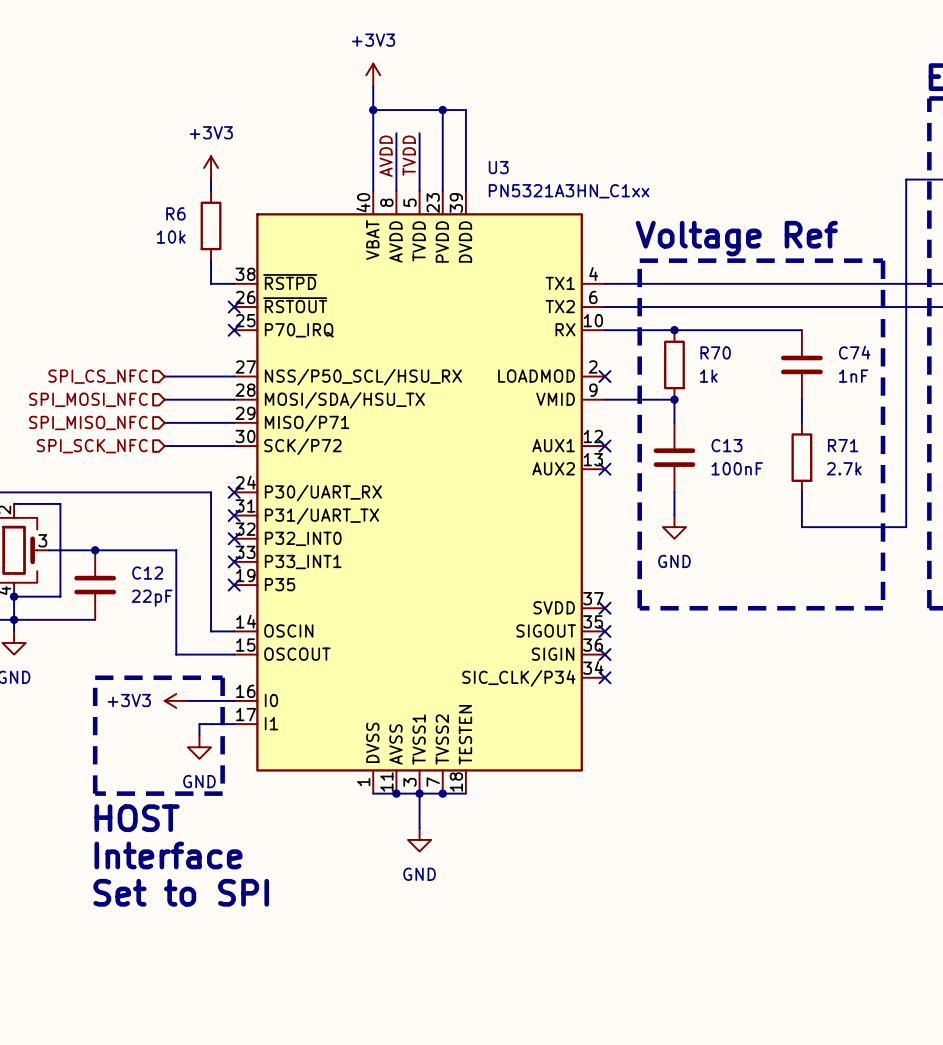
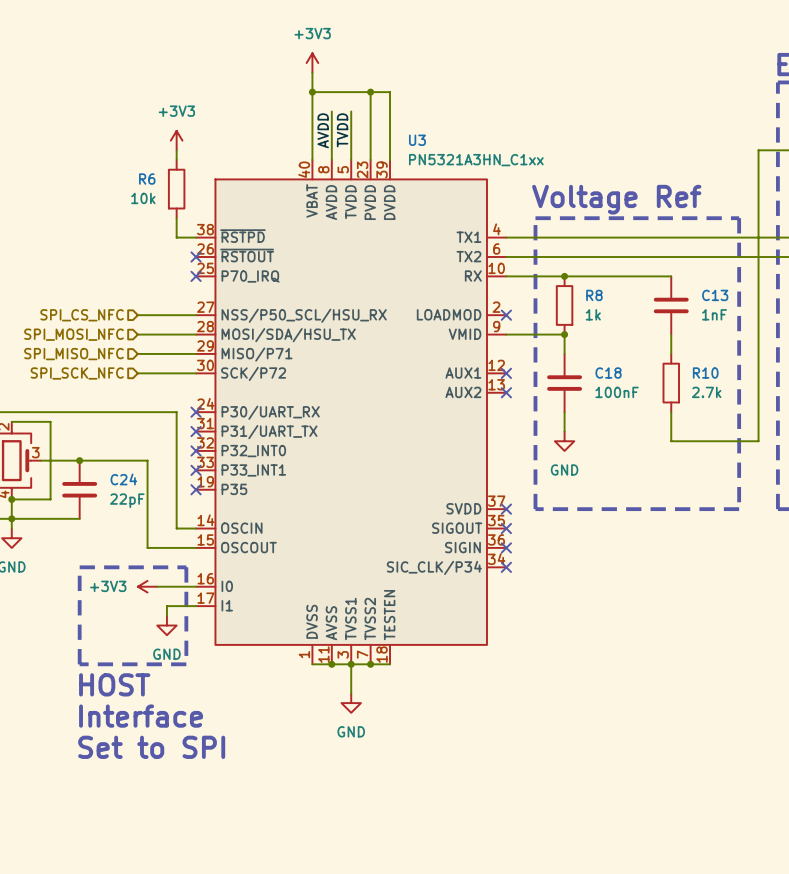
R70 name: R70 (715, 352) -> R8 (594, 295)
C74 name: C74 (854, 352) -> C13 (715, 295)
C13 name: C13 (726, 445) -> C18 (608, 373)
R71 name: R71 (843, 445) -> R10 (705, 373)
C12 name: C12 (147, 573) -> C24 (123, 479)

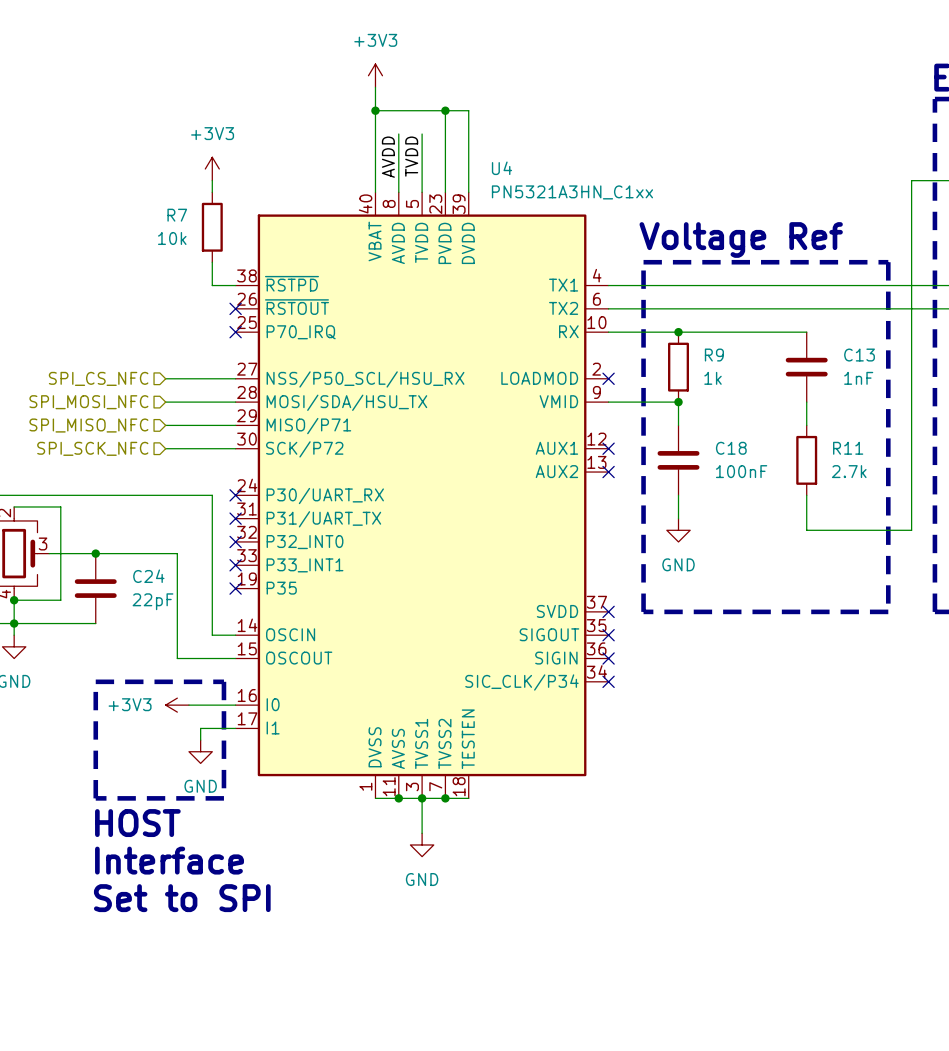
U3 name: U3 (417, 140) -> U4 (501, 168)
R6 name: R6 (147, 179) -> R7 (177, 215)
R8 name: R8 (594, 295) -> R9 (714, 355)
R10 name: R10 (705, 373) -> R11 (848, 448)

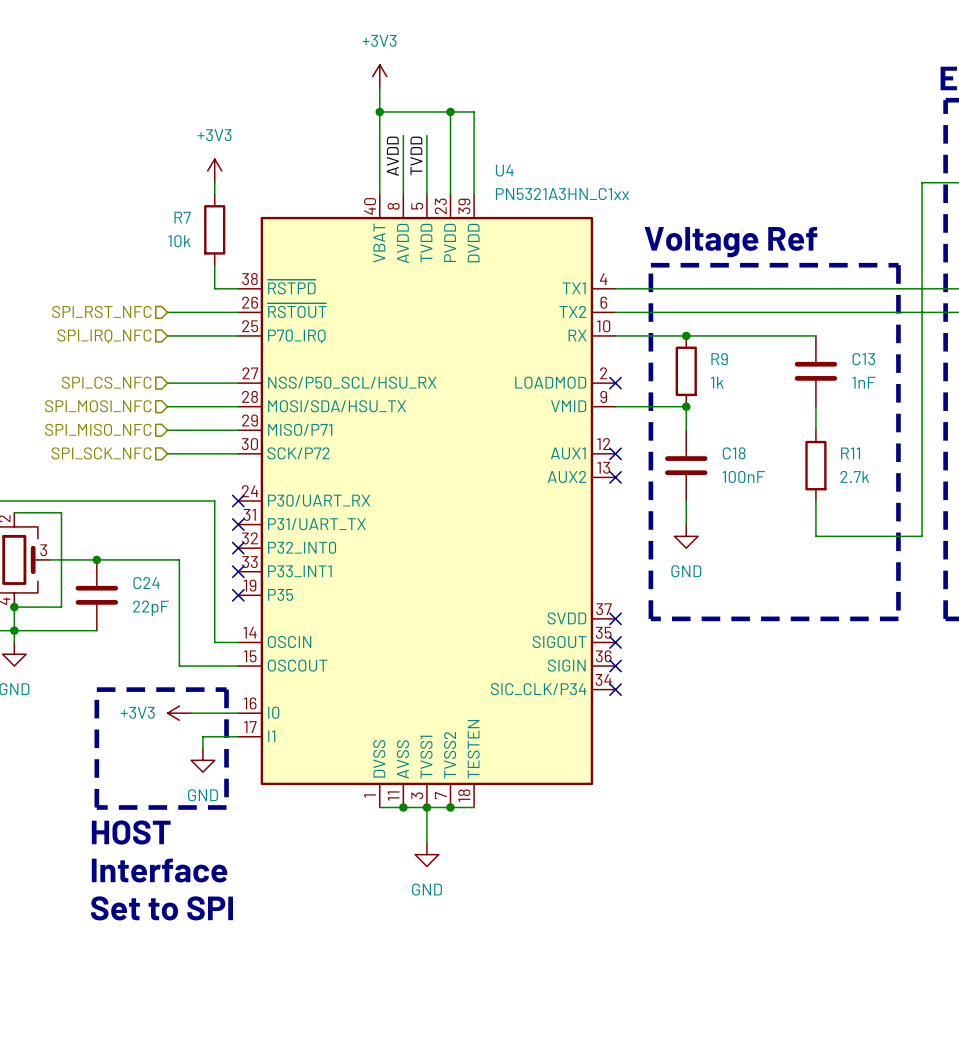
hierarchical label: none -> SPI_RST_NFC (101, 311)
wire: none -> (167, 312) (238, 312)
no-connect mark: (235, 308) -> none
hierarchical label: none -> SPI_IRQ_NFC (104, 336)
wire: none -> (167, 335) (238, 335)
no-connect mark: (235, 332) -> none

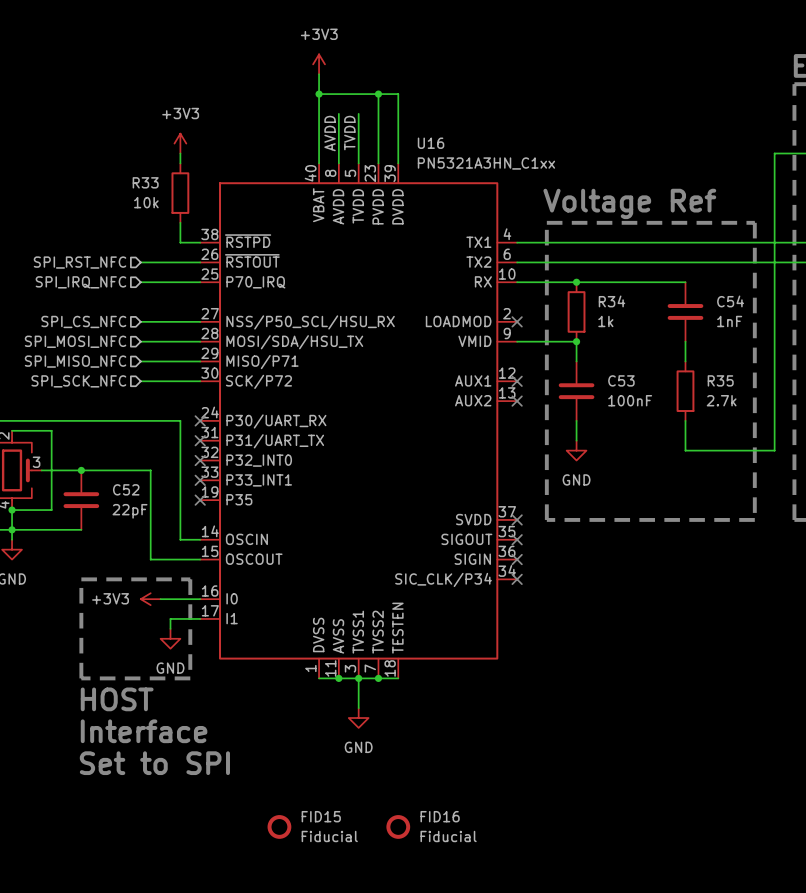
U4 name: U4 (504, 170) -> U16 (431, 143)
R7 name: R7 (182, 217) -> R33 (145, 182)
R9 name: R9 (719, 359) -> R34 (611, 301)
C13 name: C13 (863, 359) -> C54 (730, 301)
C18 name: C18 (734, 453) -> C53 (621, 380)
R11 name: R11 (850, 453) -> R35 (720, 380)
C24 name: C24 (146, 583) -> C52 (126, 489)
FID15: none -> Fiducial (279, 826)
FID16: none -> Fiducial (398, 826)

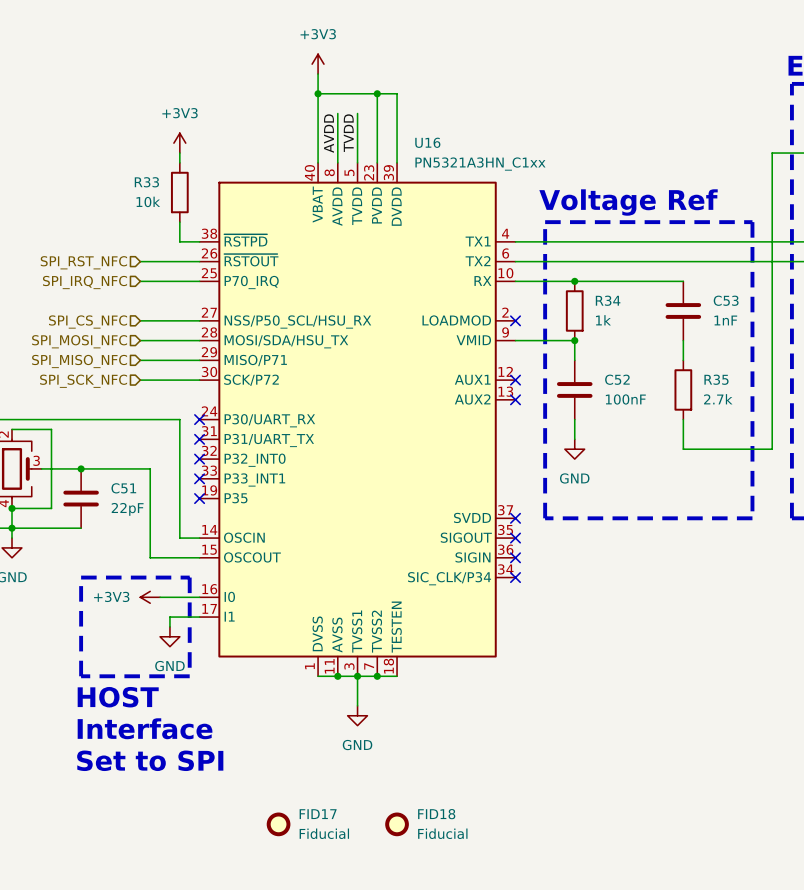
C54 name: C54 (730, 301) -> C53 (726, 300)
C53 name: C53 (621, 380) -> C52 (617, 379)
C52 name: C52 (126, 489) -> C51 (123, 488)
FID15 name: FID15 (321, 816) -> FID17 (318, 814)
FID16 name: FID16 (440, 816) -> FID18 (436, 814)

